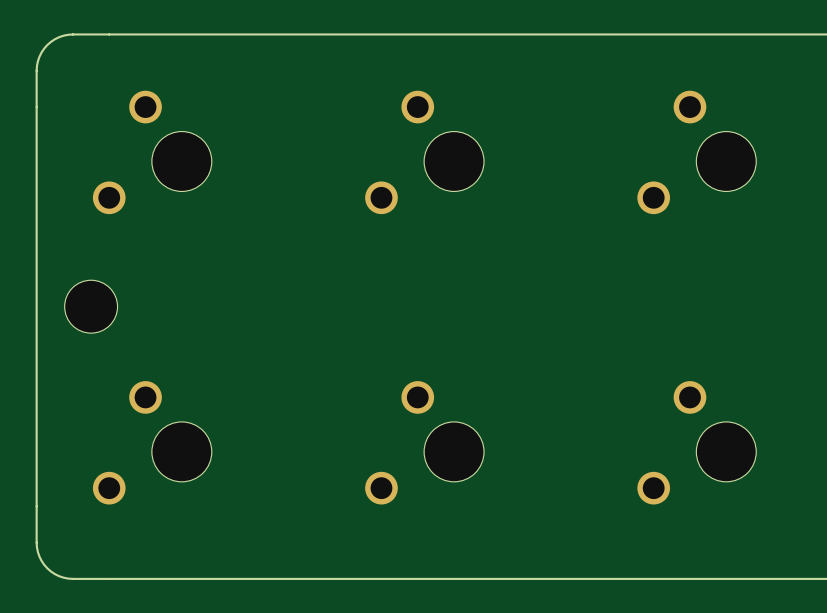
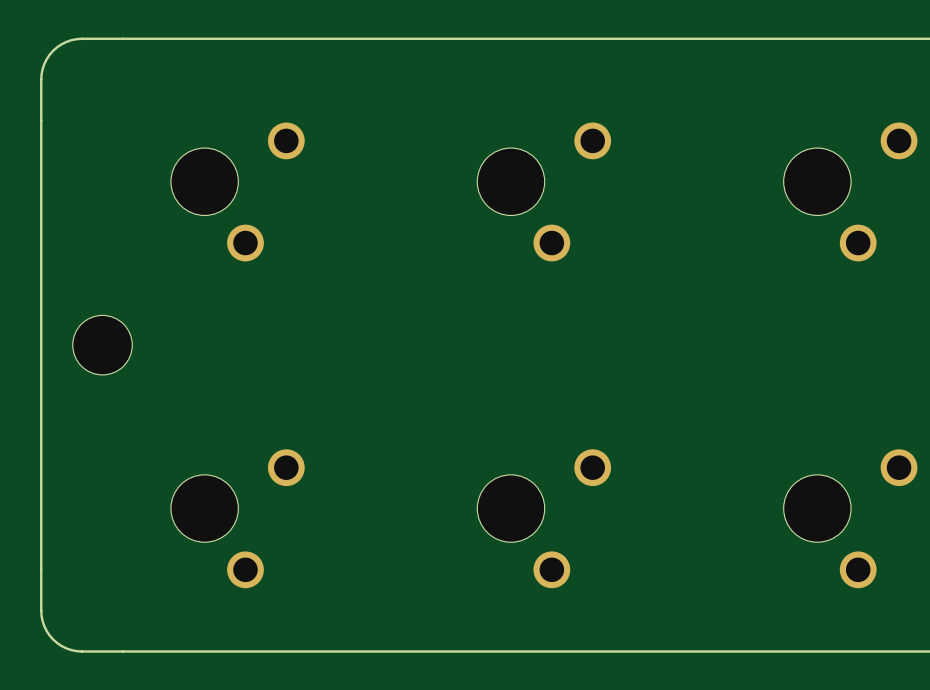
part rotation: 0° (152, 152) -> 180° (237, 191)
part rotation: 0° (424, 152) -> 180° (544, 191)
part rotation: 0° (696, 152) -> 180° (850, 191)
part rotation: 0° (152, 442) -> 180° (237, 518)
part rotation: 0° (424, 442) -> 180° (544, 518)
part rotation: 0° (696, 442) -> 180° (850, 518)

